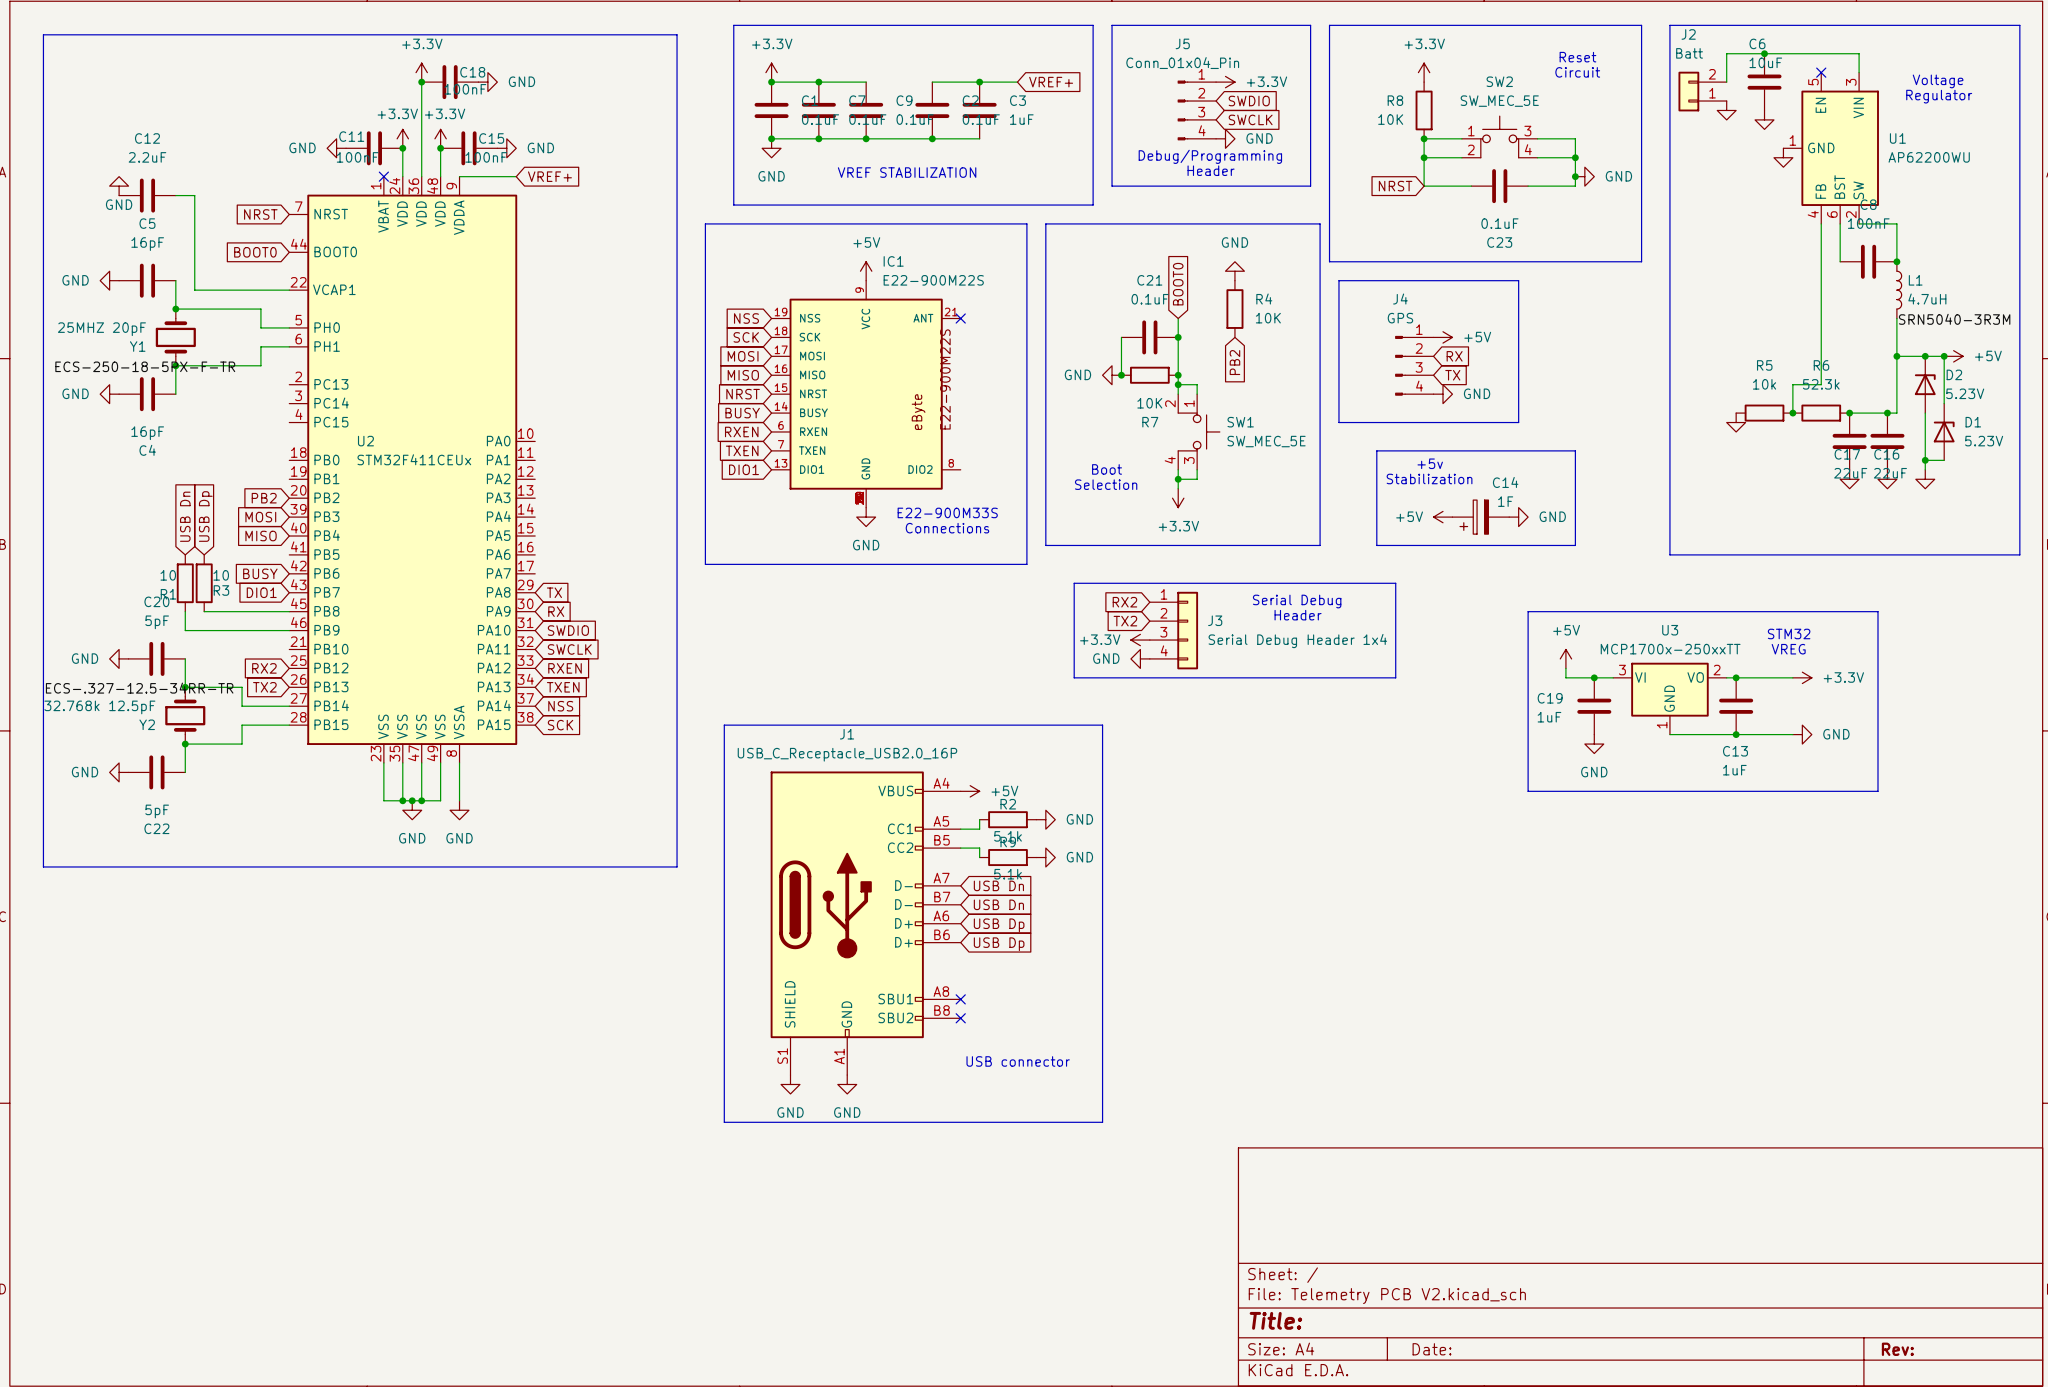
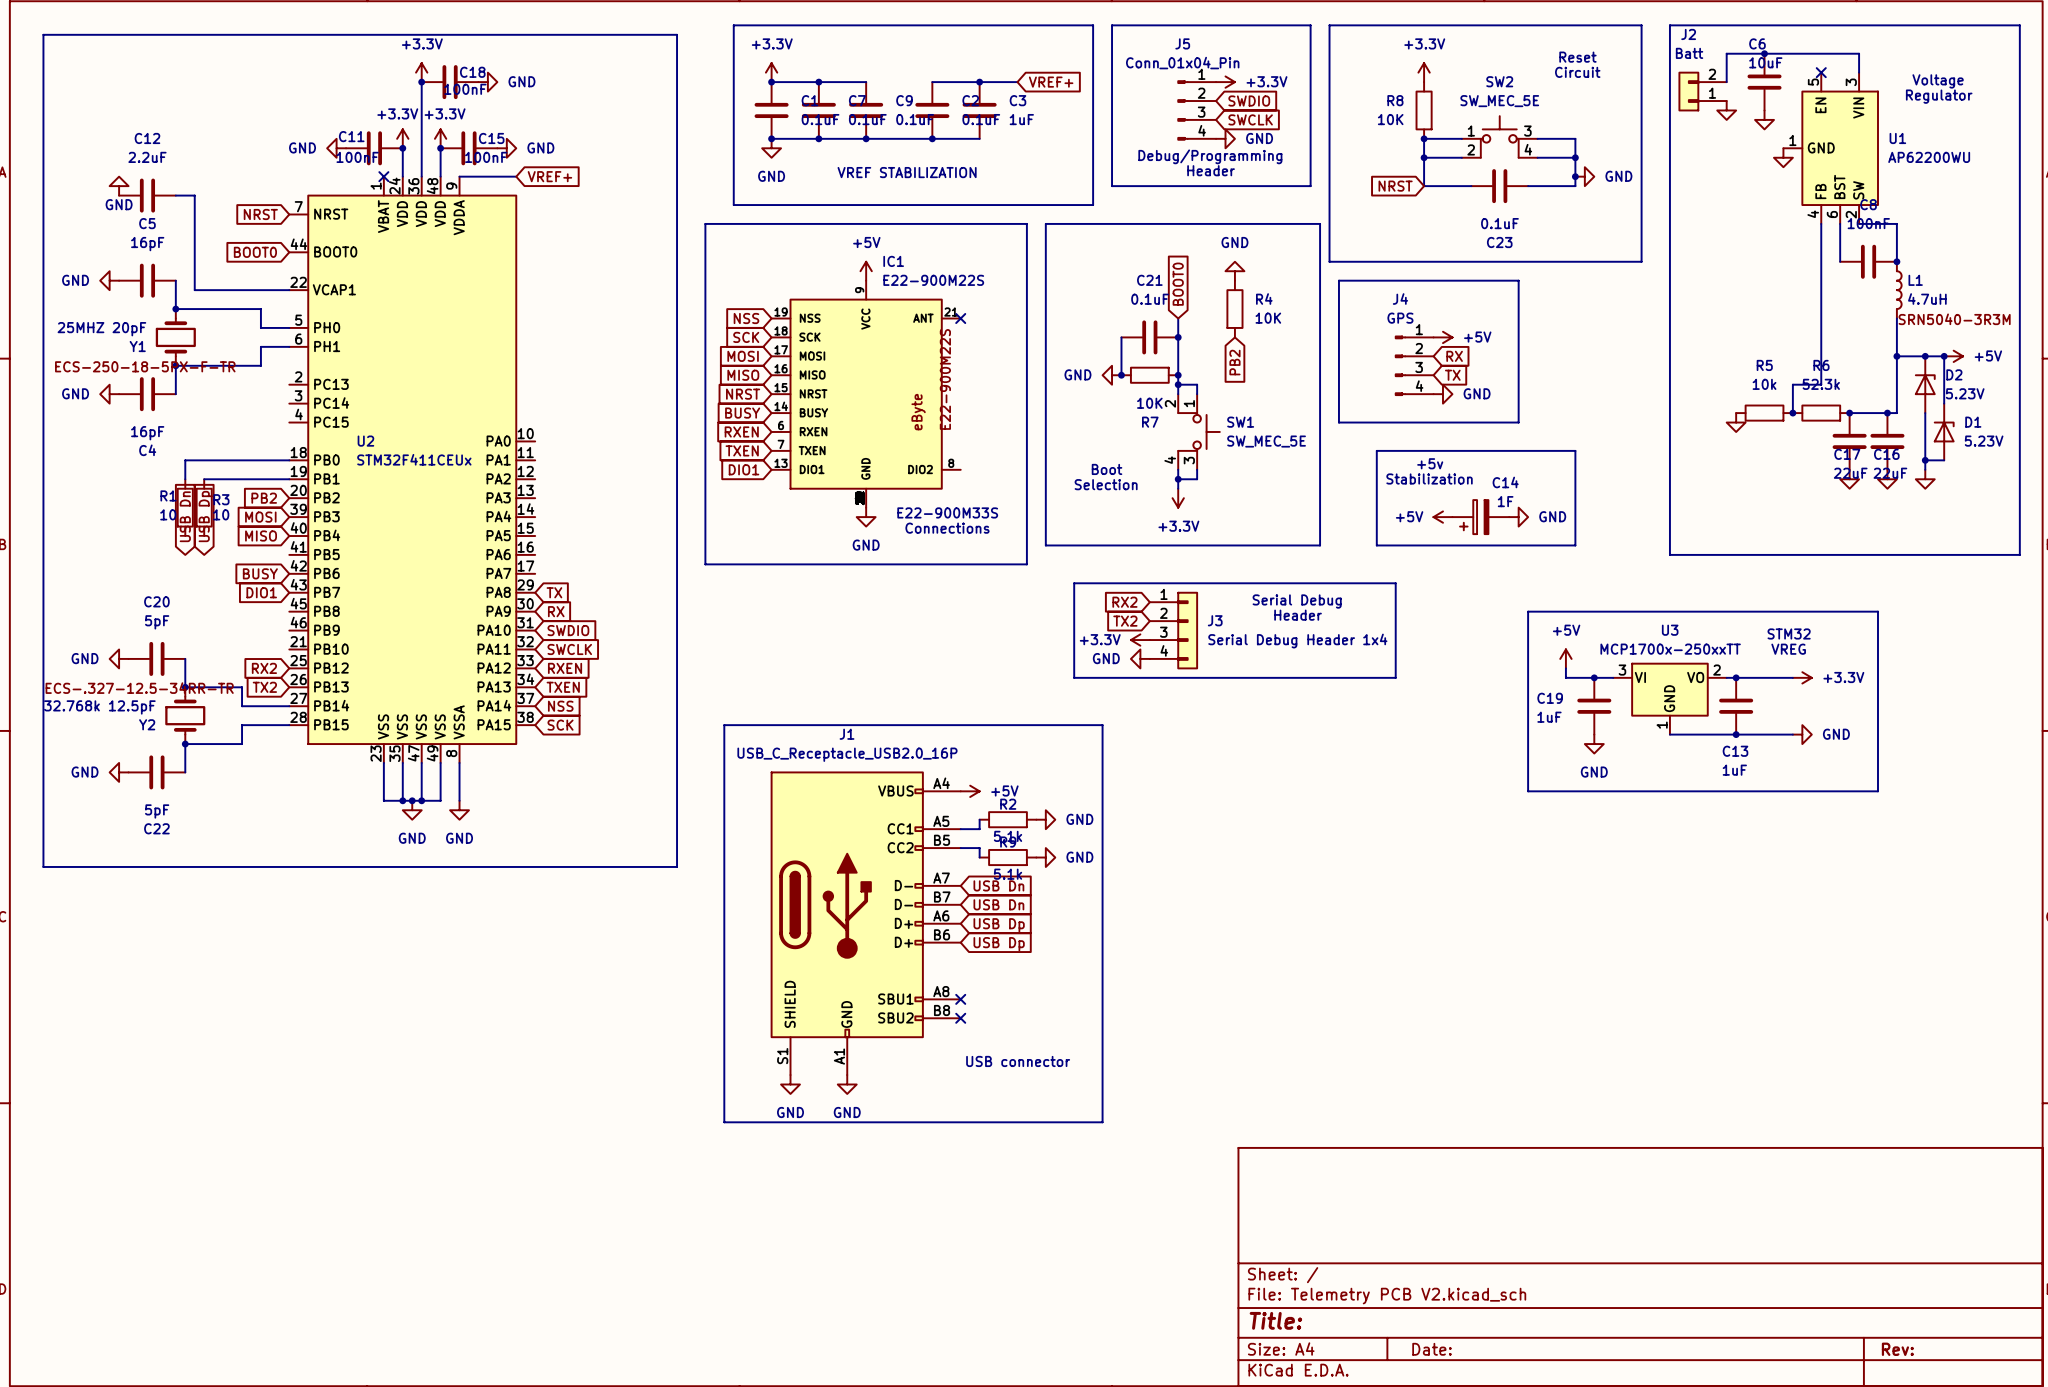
wire: none -> (289, 460) (185, 460) (185, 479)
R1 value position: 10 (168, 575) -> 10 (168, 514)
R3 value position: 10 (221, 575) -> 10 (221, 514)
R1 position: (185, 583) -> (185, 507)
R3 position: (204, 583) -> (204, 507)
R3 name position: R3 (221, 590) -> R3 (221, 499)
R1 name position: R1 (168, 594) -> R1 (168, 495)
wire: (185, 611) (185, 630) (289, 630) -> none
wire: (204, 611) (289, 611) -> (204, 479) (289, 479)

